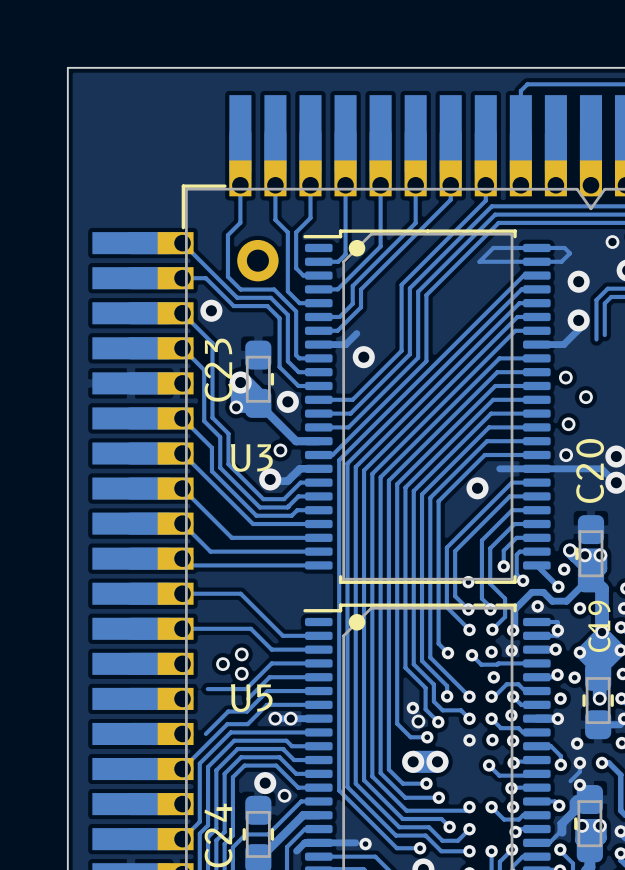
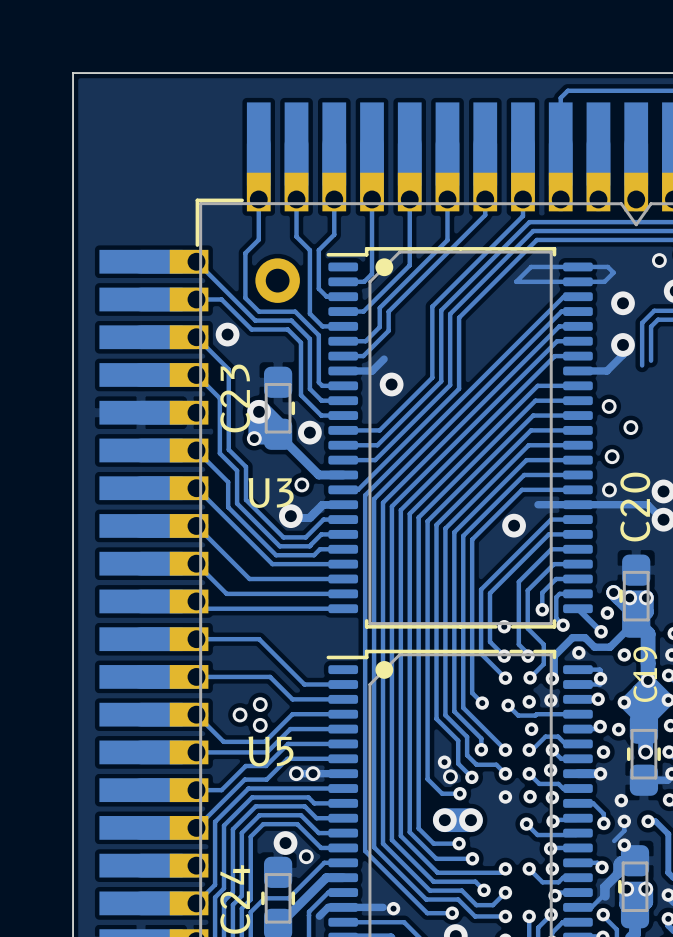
track: none -> (196, 714) (223, 741)
track: none -> (266, 752) (196, 752)
track: none -> (221, 790) (196, 790)

